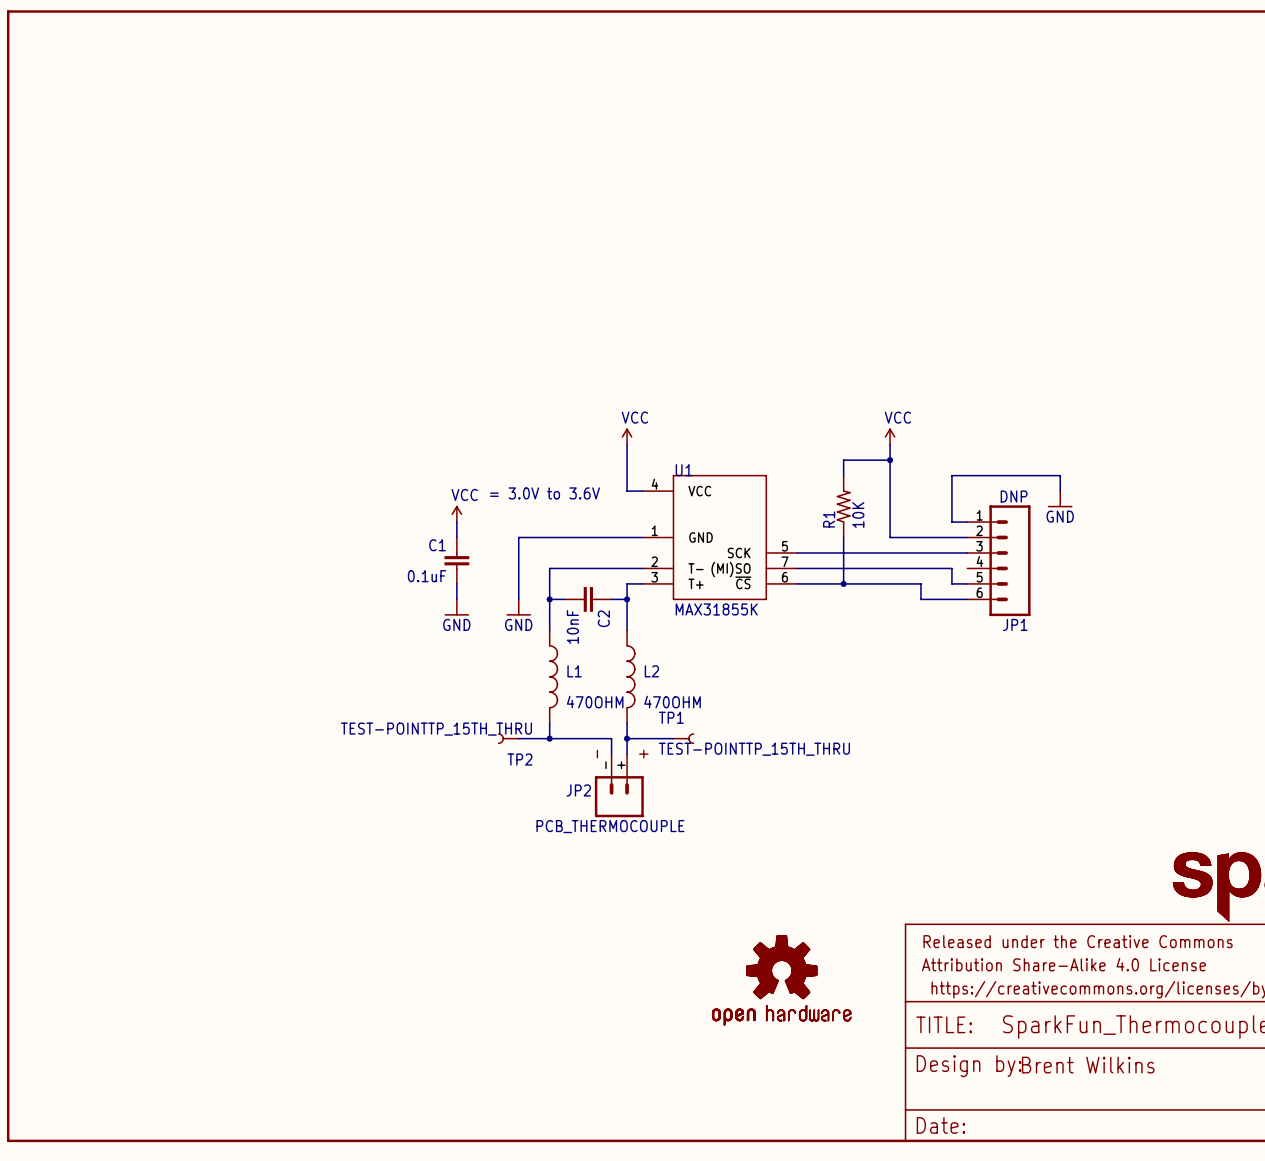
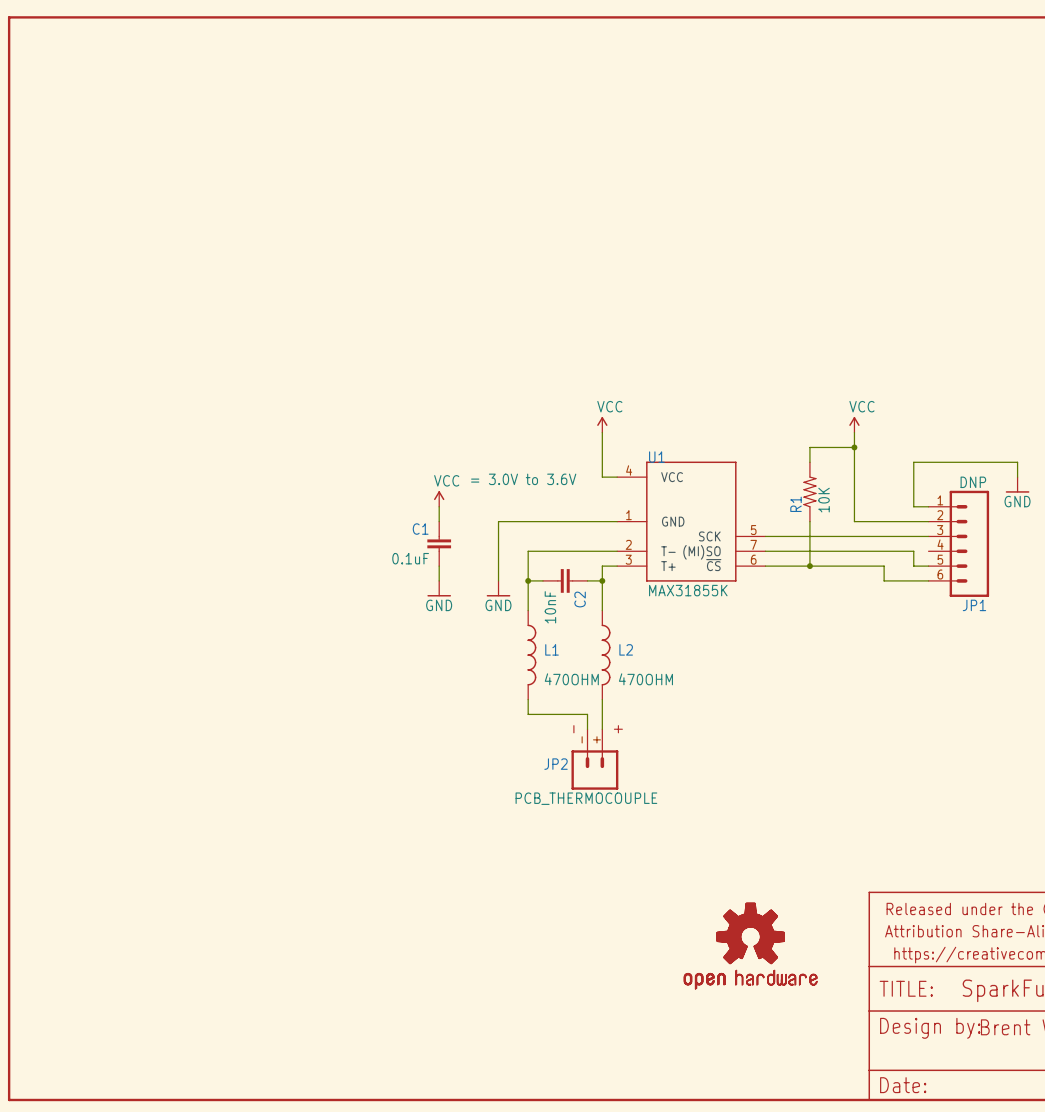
TP2: TEST-POINTTP_15TH_THRU (508, 738) -> none
wire: (518, 738) (549, 738) -> none
junction: (549, 738) -> none
wire: (627, 738) (673, 738) -> none
junction: (627, 738) -> none
TP1: TEST-POINTTP_15TH_THRU (683, 738) -> none

